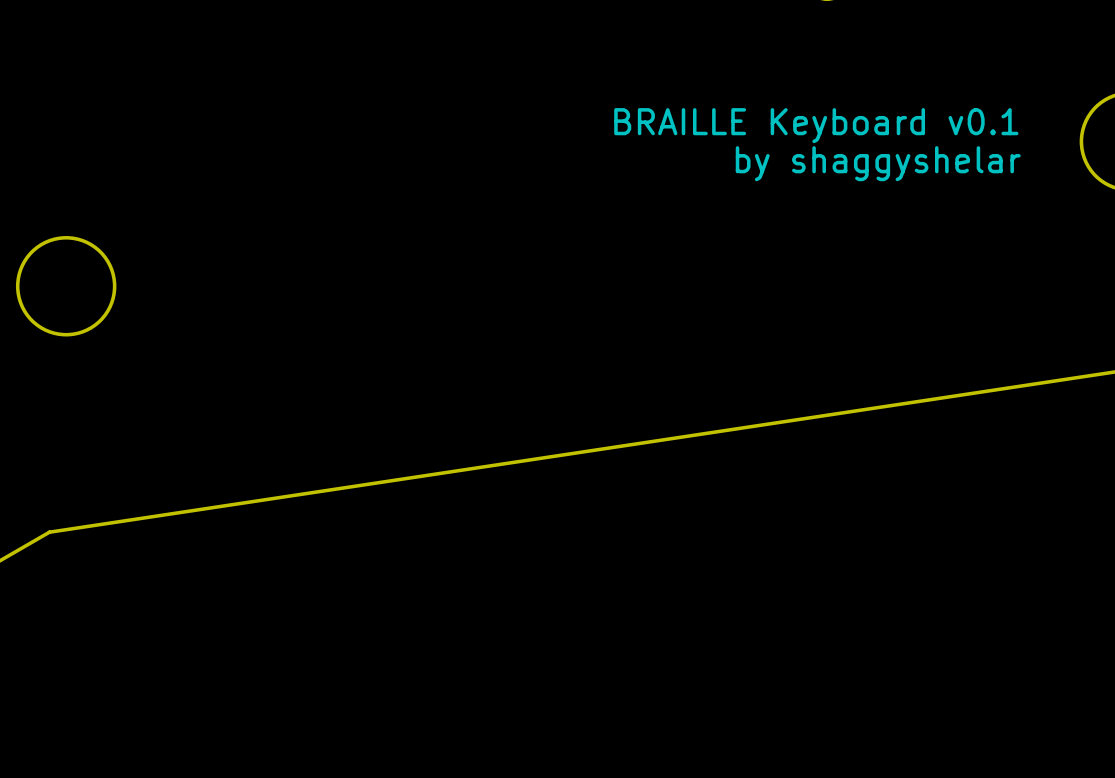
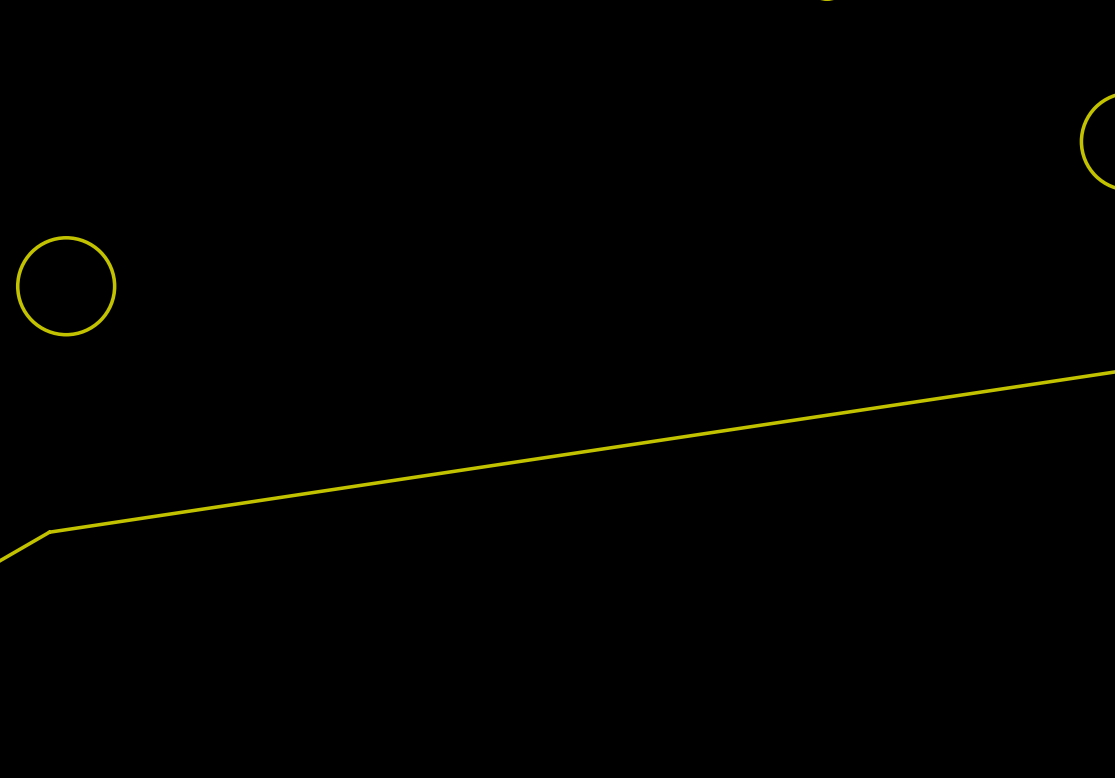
text: BRAILLE Keyboard v0.1 (816, 125) -> none
text: by shaggyshelar (878, 163) -> none

